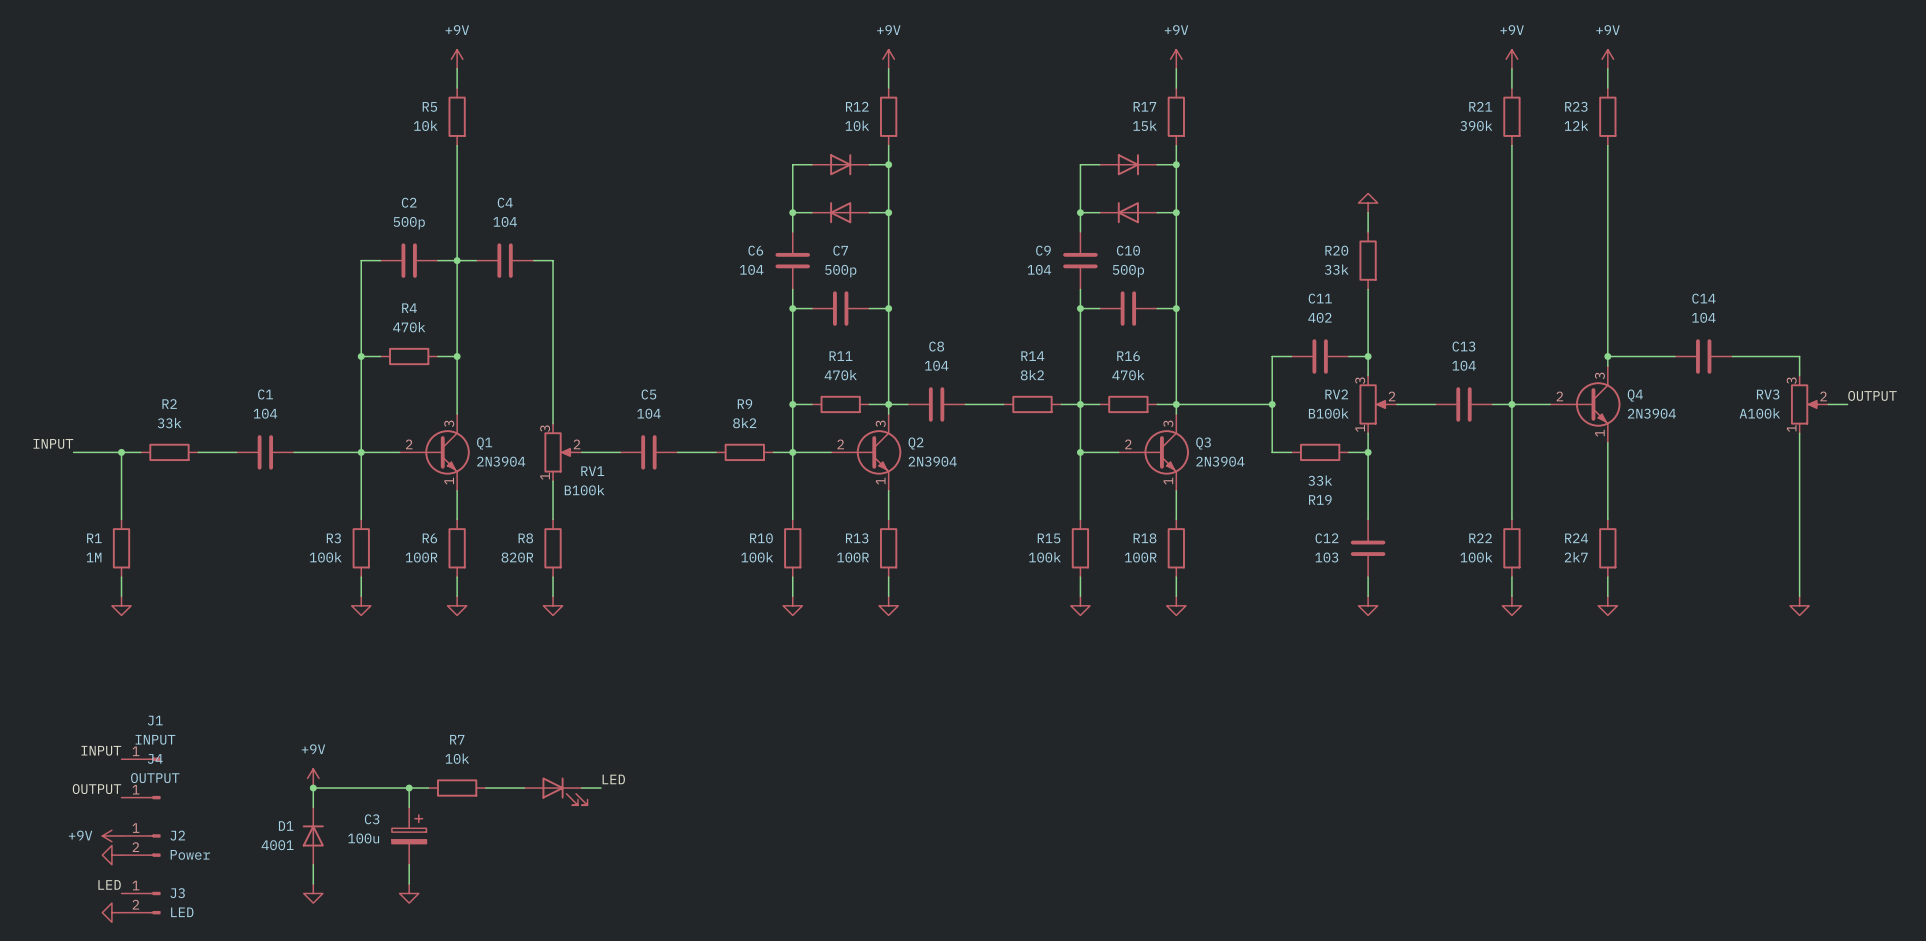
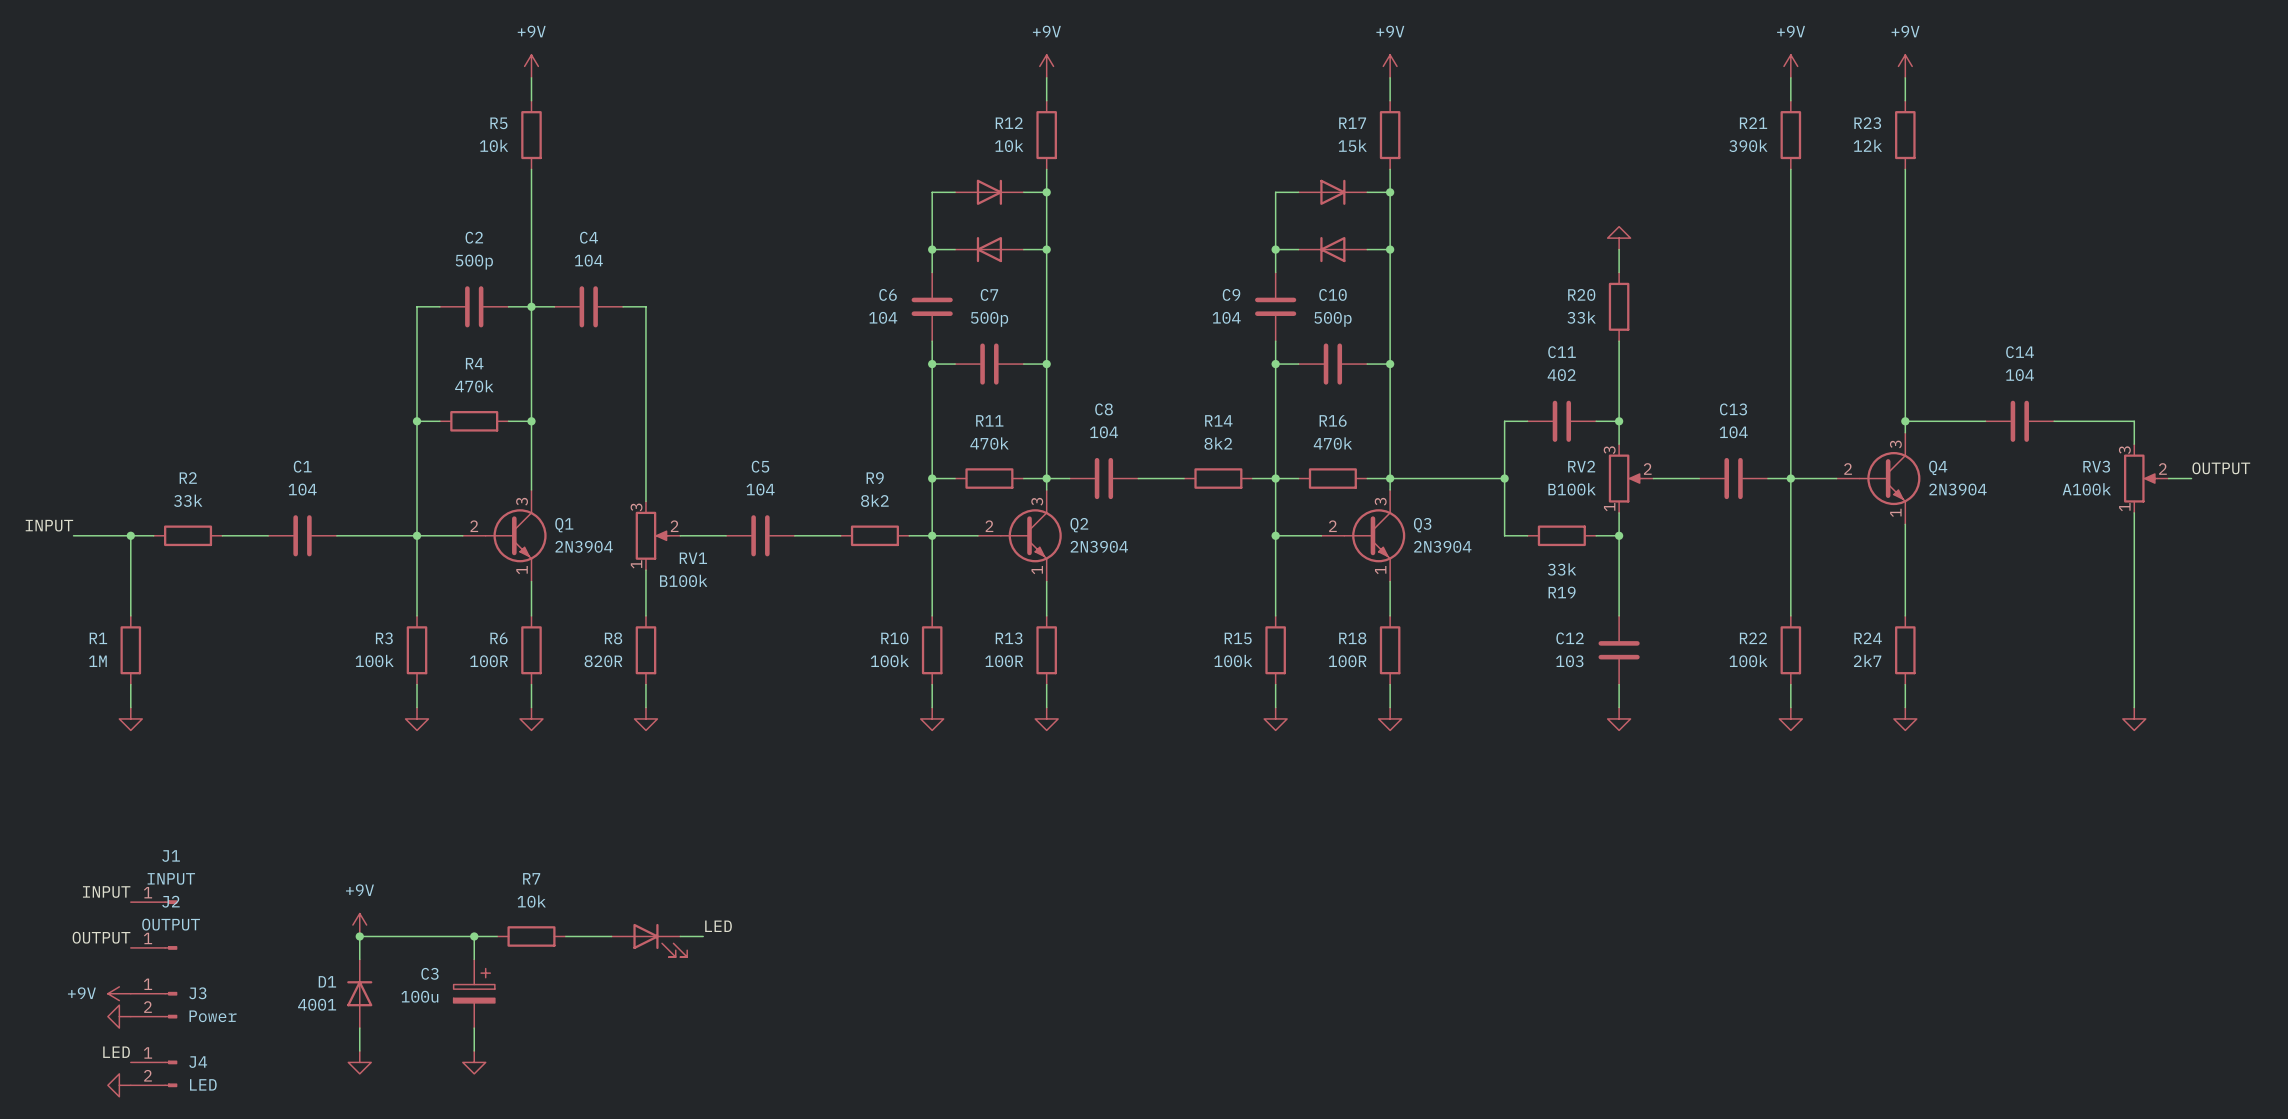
J4 name: J4 (155, 758) -> J2 (170, 901)
J2 name: J2 (177, 835) -> J3 (197, 993)
J3 name: J3 (177, 893) -> J4 (198, 1062)

